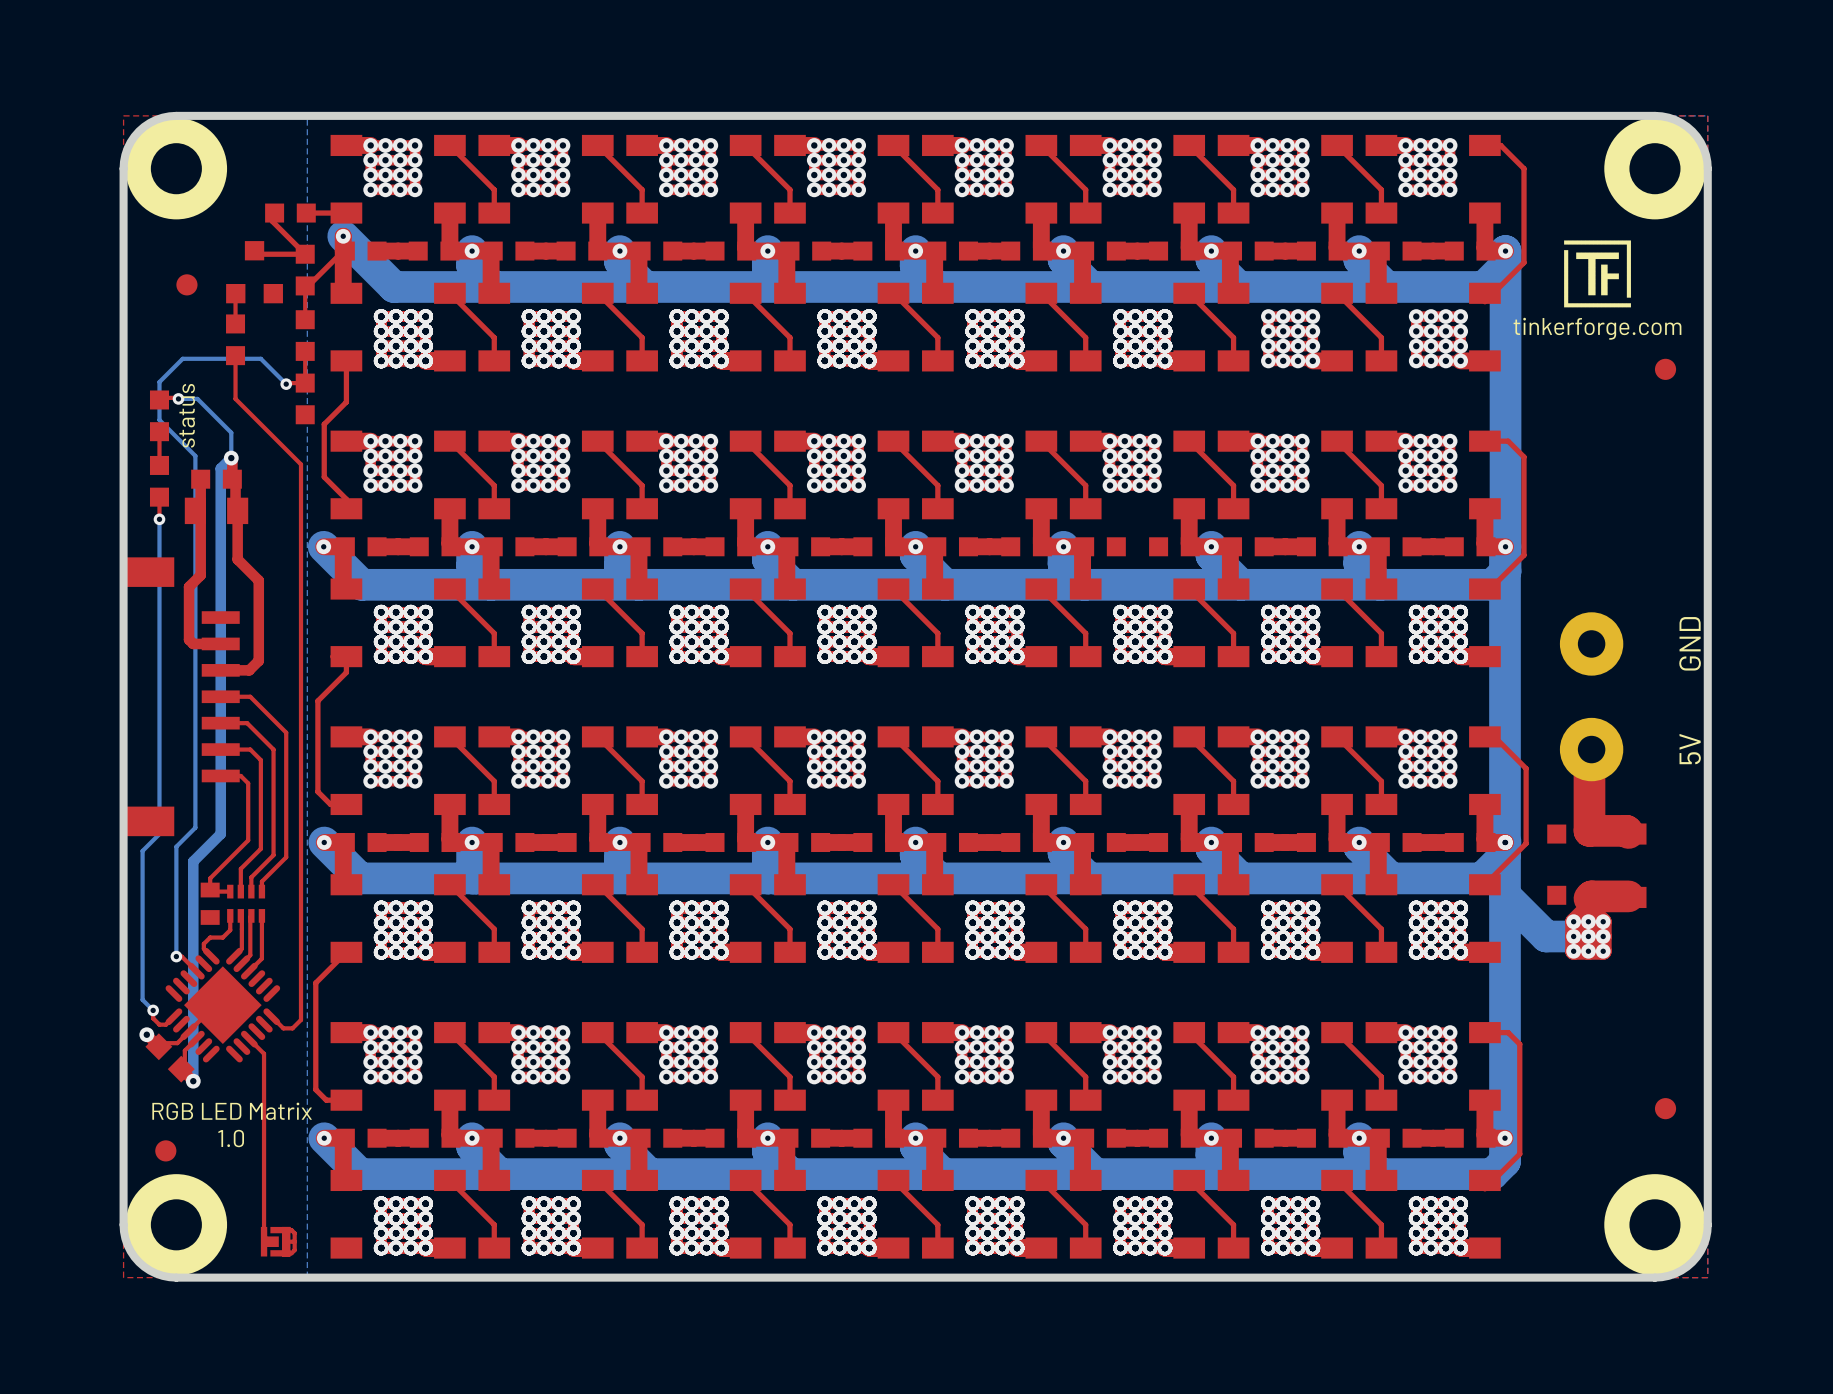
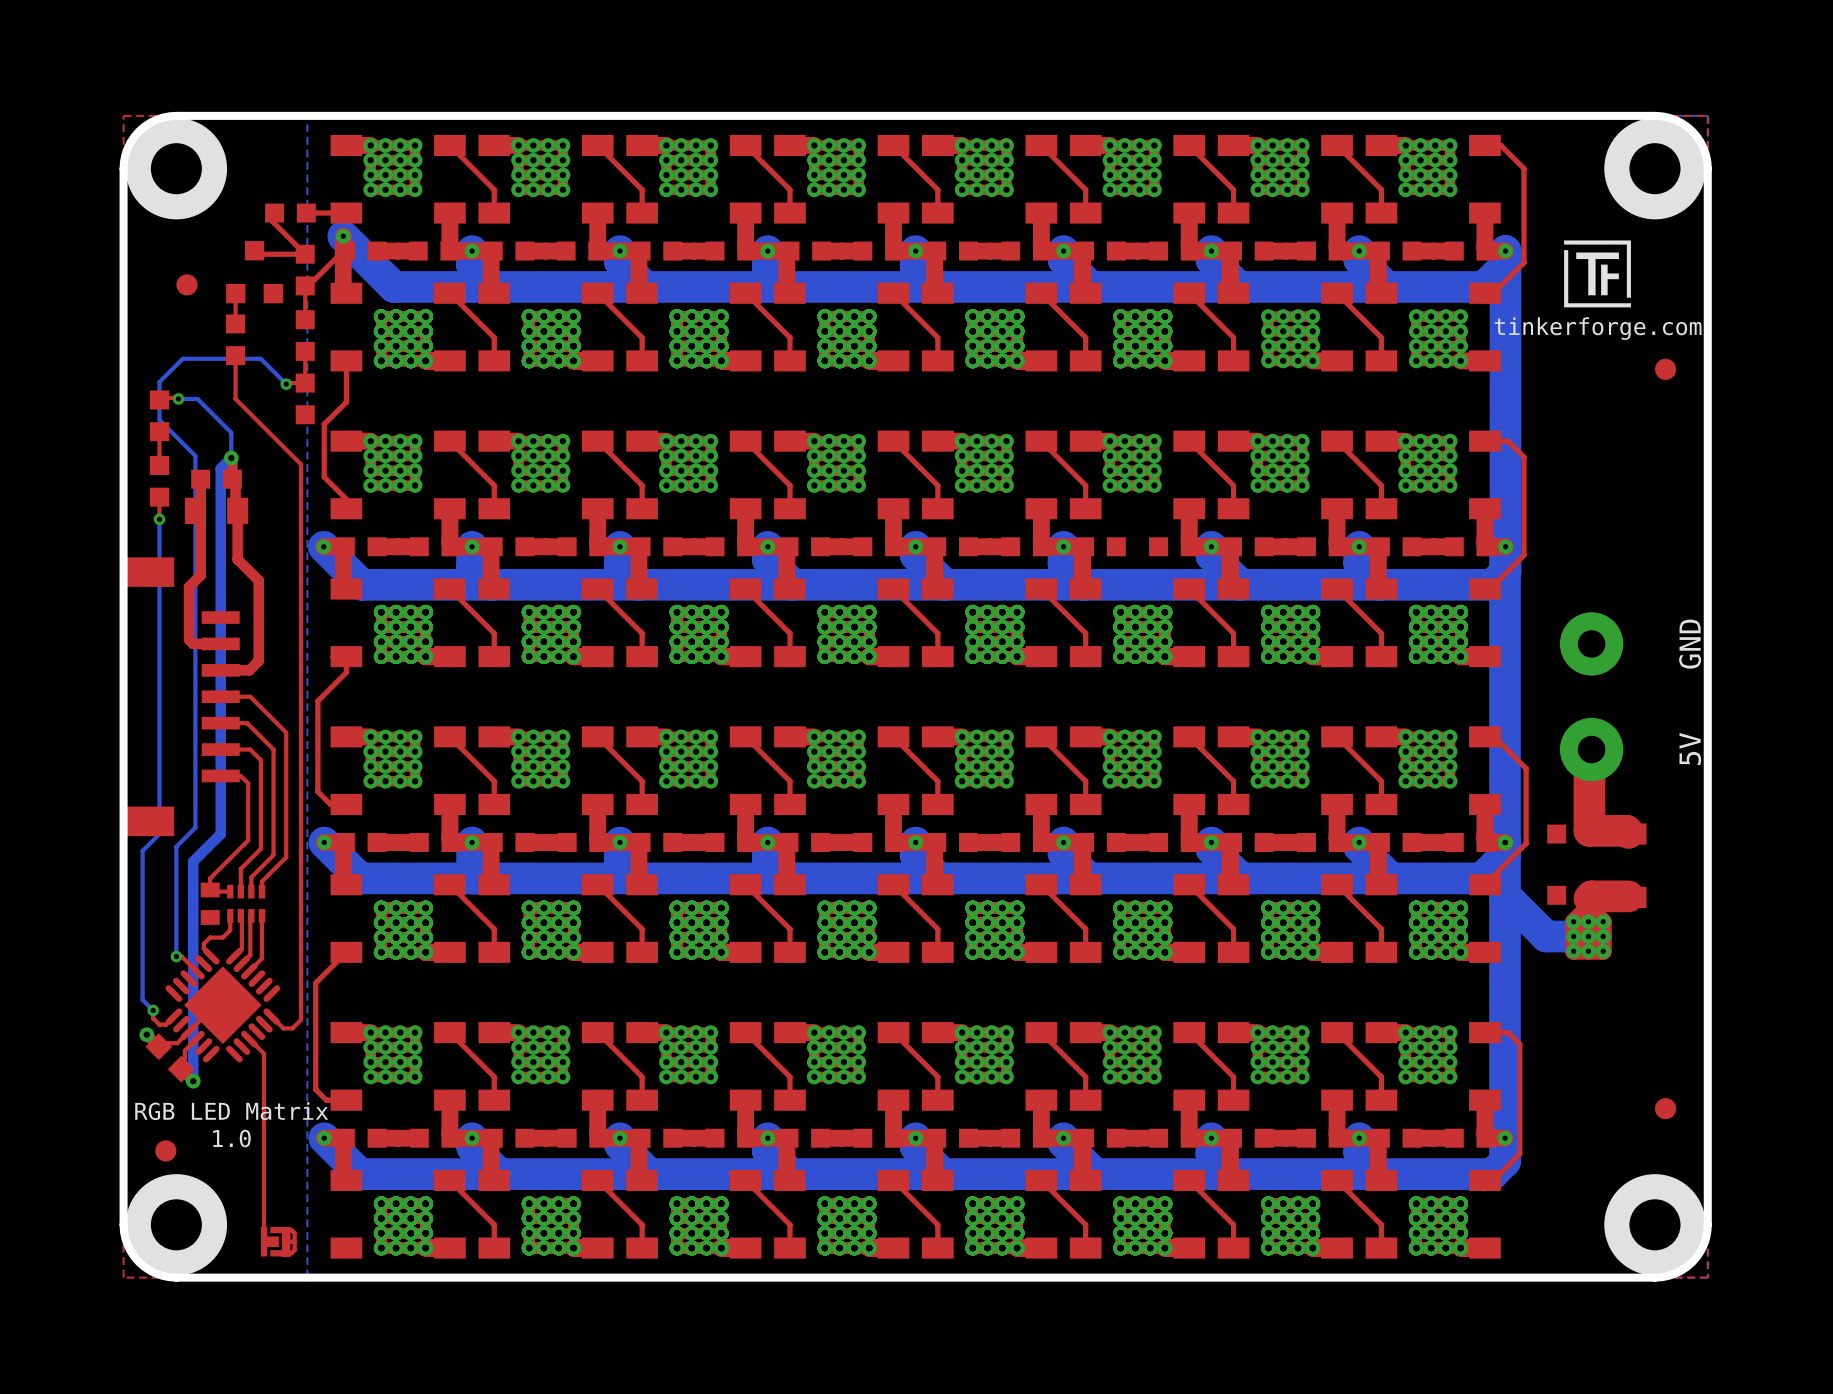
text: status (187, 415) -> none

